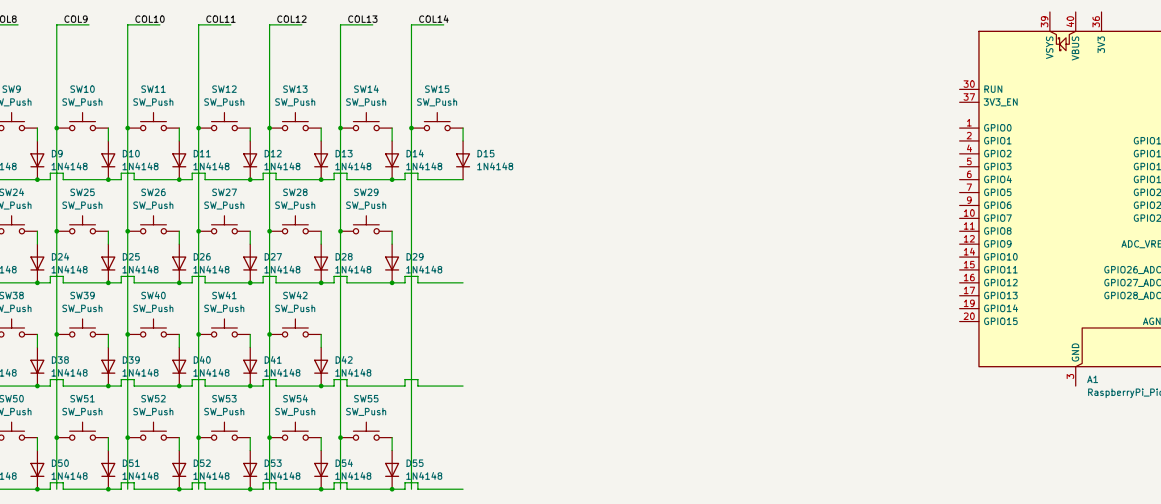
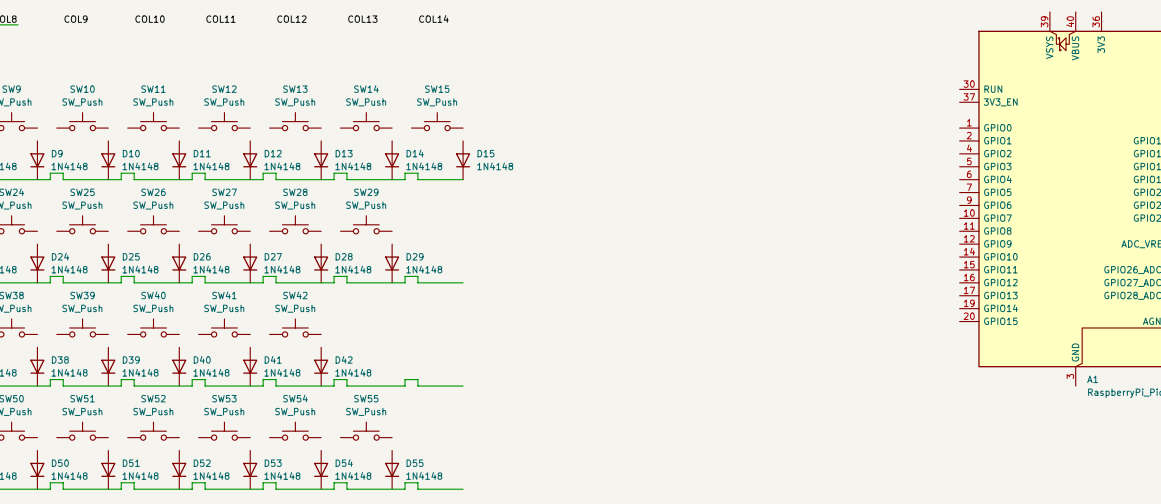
wire: (89, 24) (56, 24) (56, 489) -> none
wire: (159, 24) (127, 24) (127, 489) -> none
wire: (230, 24) (198, 24) (198, 489) -> none
wire: (301, 24) (269, 24) (269, 489) -> none
wire: (372, 24) (340, 24) (340, 489) -> none
wire: (443, 24) (411, 24) (411, 489) -> none
wire: (37, 128) (37, 140) -> none
junction: (56, 128) -> none
wire: (108, 128) (108, 140) -> none
junction: (127, 128) -> none
wire: (179, 128) (179, 140) -> none
junction: (198, 128) -> none
wire: (250, 128) (250, 140) -> none
junction: (269, 128) -> none
wire: (321, 128) (321, 140) -> none
junction: (340, 128) -> none
wire: (392, 128) (392, 140) -> none
junction: (411, 128) -> none
wire: (463, 128) (463, 140) -> none
junction: (37, 179) -> none
junction: (108, 179) -> none
junction: (179, 179) -> none
junction: (250, 179) -> none
junction: (321, 179) -> none
junction: (392, 179) -> none
wire: (37, 231) (37, 244) -> none
junction: (56, 231) -> none
wire: (108, 231) (108, 244) -> none
junction: (127, 231) -> none
wire: (179, 231) (179, 244) -> none
junction: (198, 231) -> none
wire: (250, 231) (250, 244) -> none
junction: (269, 231) -> none
wire: (321, 231) (321, 244) -> none
junction: (340, 231) -> none
wire: (392, 231) (392, 244) -> none
junction: (37, 282) -> none
junction: (108, 282) -> none
junction: (179, 282) -> none
junction: (250, 282) -> none
junction: (321, 282) -> none
junction: (392, 282) -> none
wire: (37, 334) (37, 347) -> none
junction: (56, 334) -> none
wire: (108, 334) (108, 347) -> none
junction: (127, 334) -> none
wire: (179, 334) (179, 347) -> none
junction: (198, 334) -> none
wire: (250, 334) (250, 347) -> none
junction: (269, 334) -> none
wire: (321, 334) (321, 347) -> none
junction: (37, 386) -> none
junction: (108, 386) -> none
junction: (179, 386) -> none
junction: (250, 386) -> none
junction: (321, 386) -> none
wire: (37, 437) (37, 450) -> none
junction: (56, 437) -> none
wire: (108, 437) (108, 450) -> none
junction: (127, 437) -> none
wire: (179, 437) (179, 450) -> none
junction: (198, 437) -> none
wire: (250, 437) (250, 450) -> none
junction: (269, 437) -> none
wire: (321, 437) (321, 450) -> none
junction: (340, 437) -> none
wire: (392, 437) (392, 450) -> none
junction: (37, 489) -> none
junction: (108, 489) -> none
junction: (179, 489) -> none
junction: (250, 489) -> none
junction: (321, 489) -> none
junction: (392, 489) -> none

